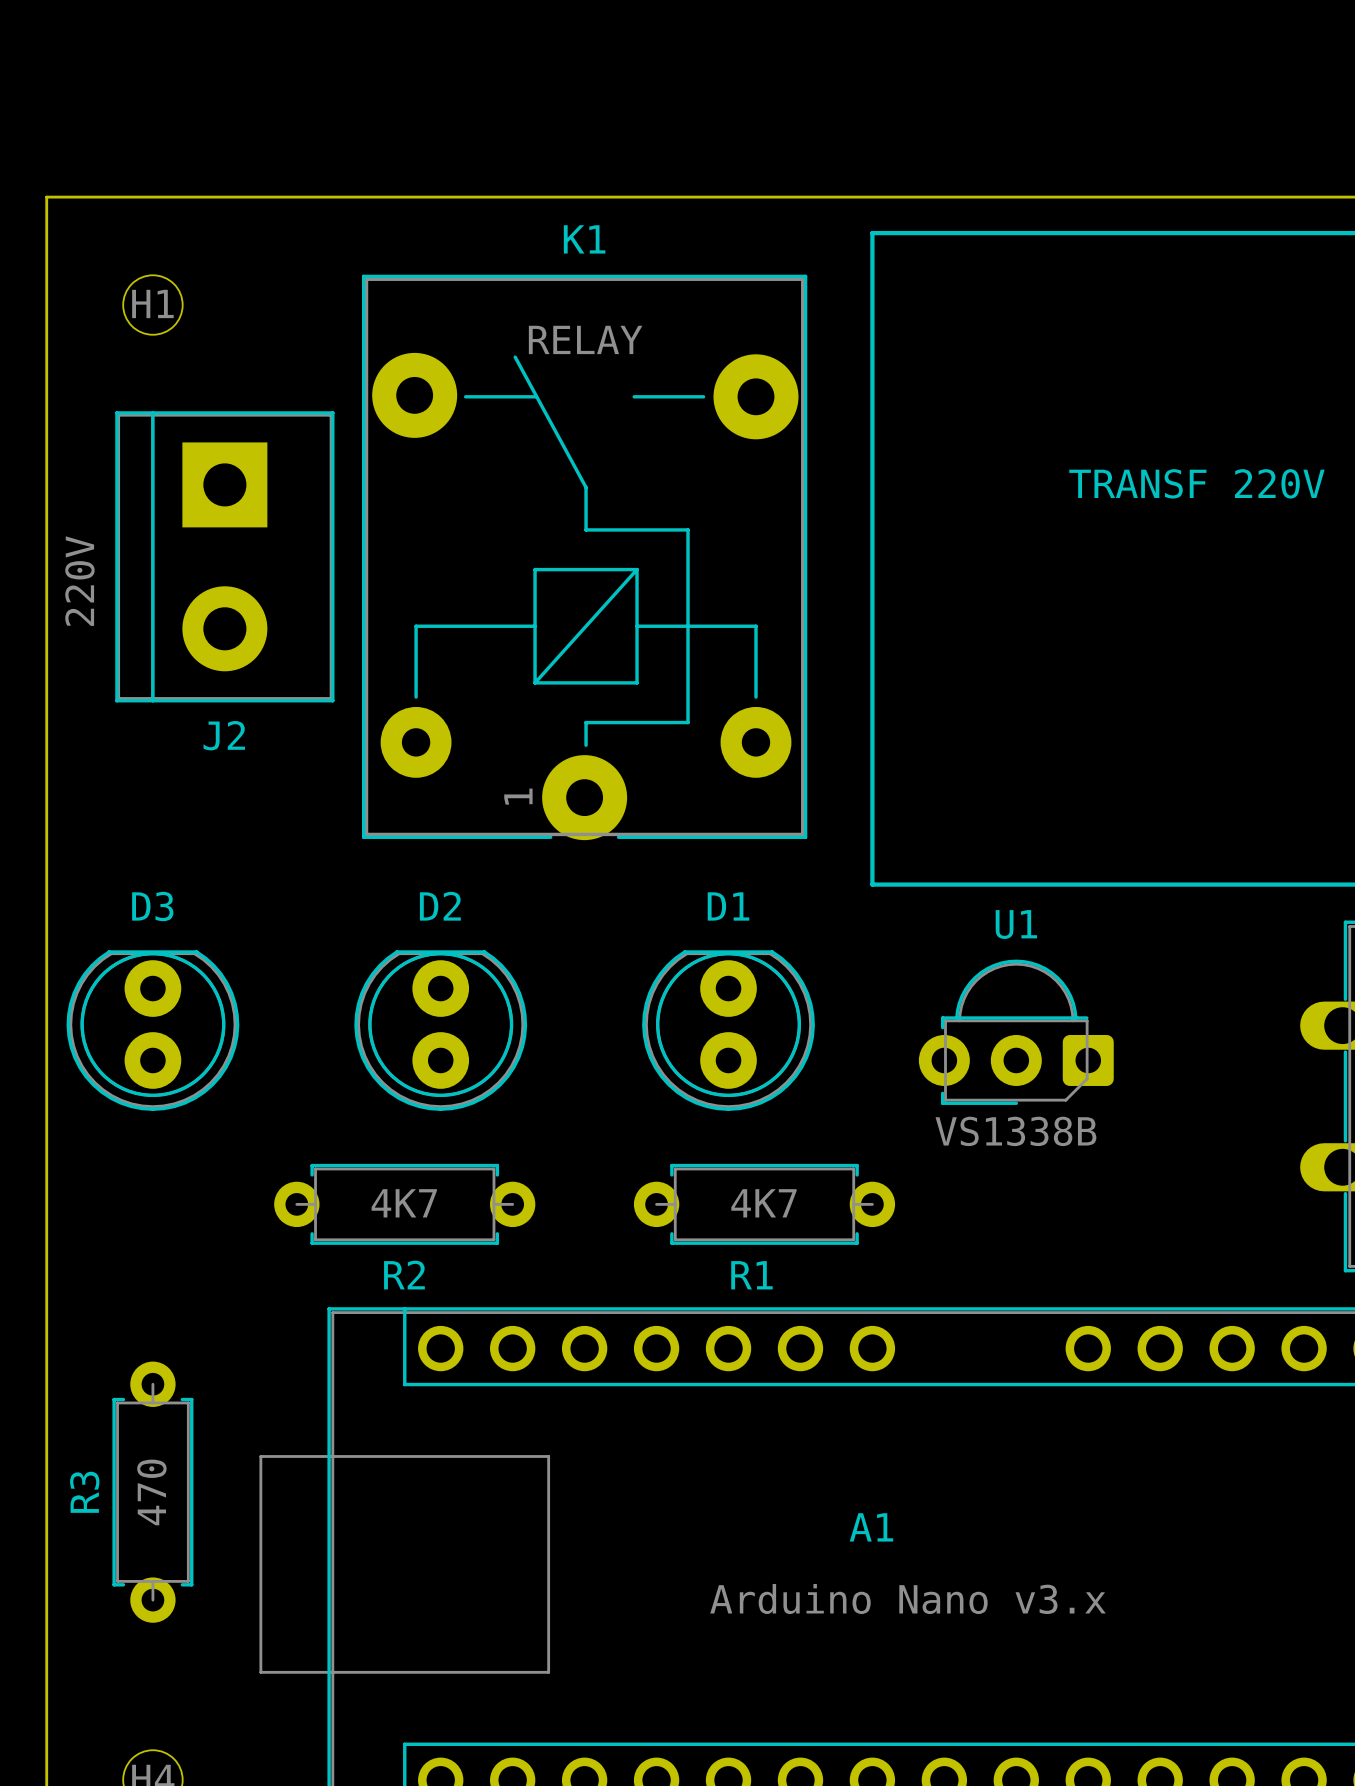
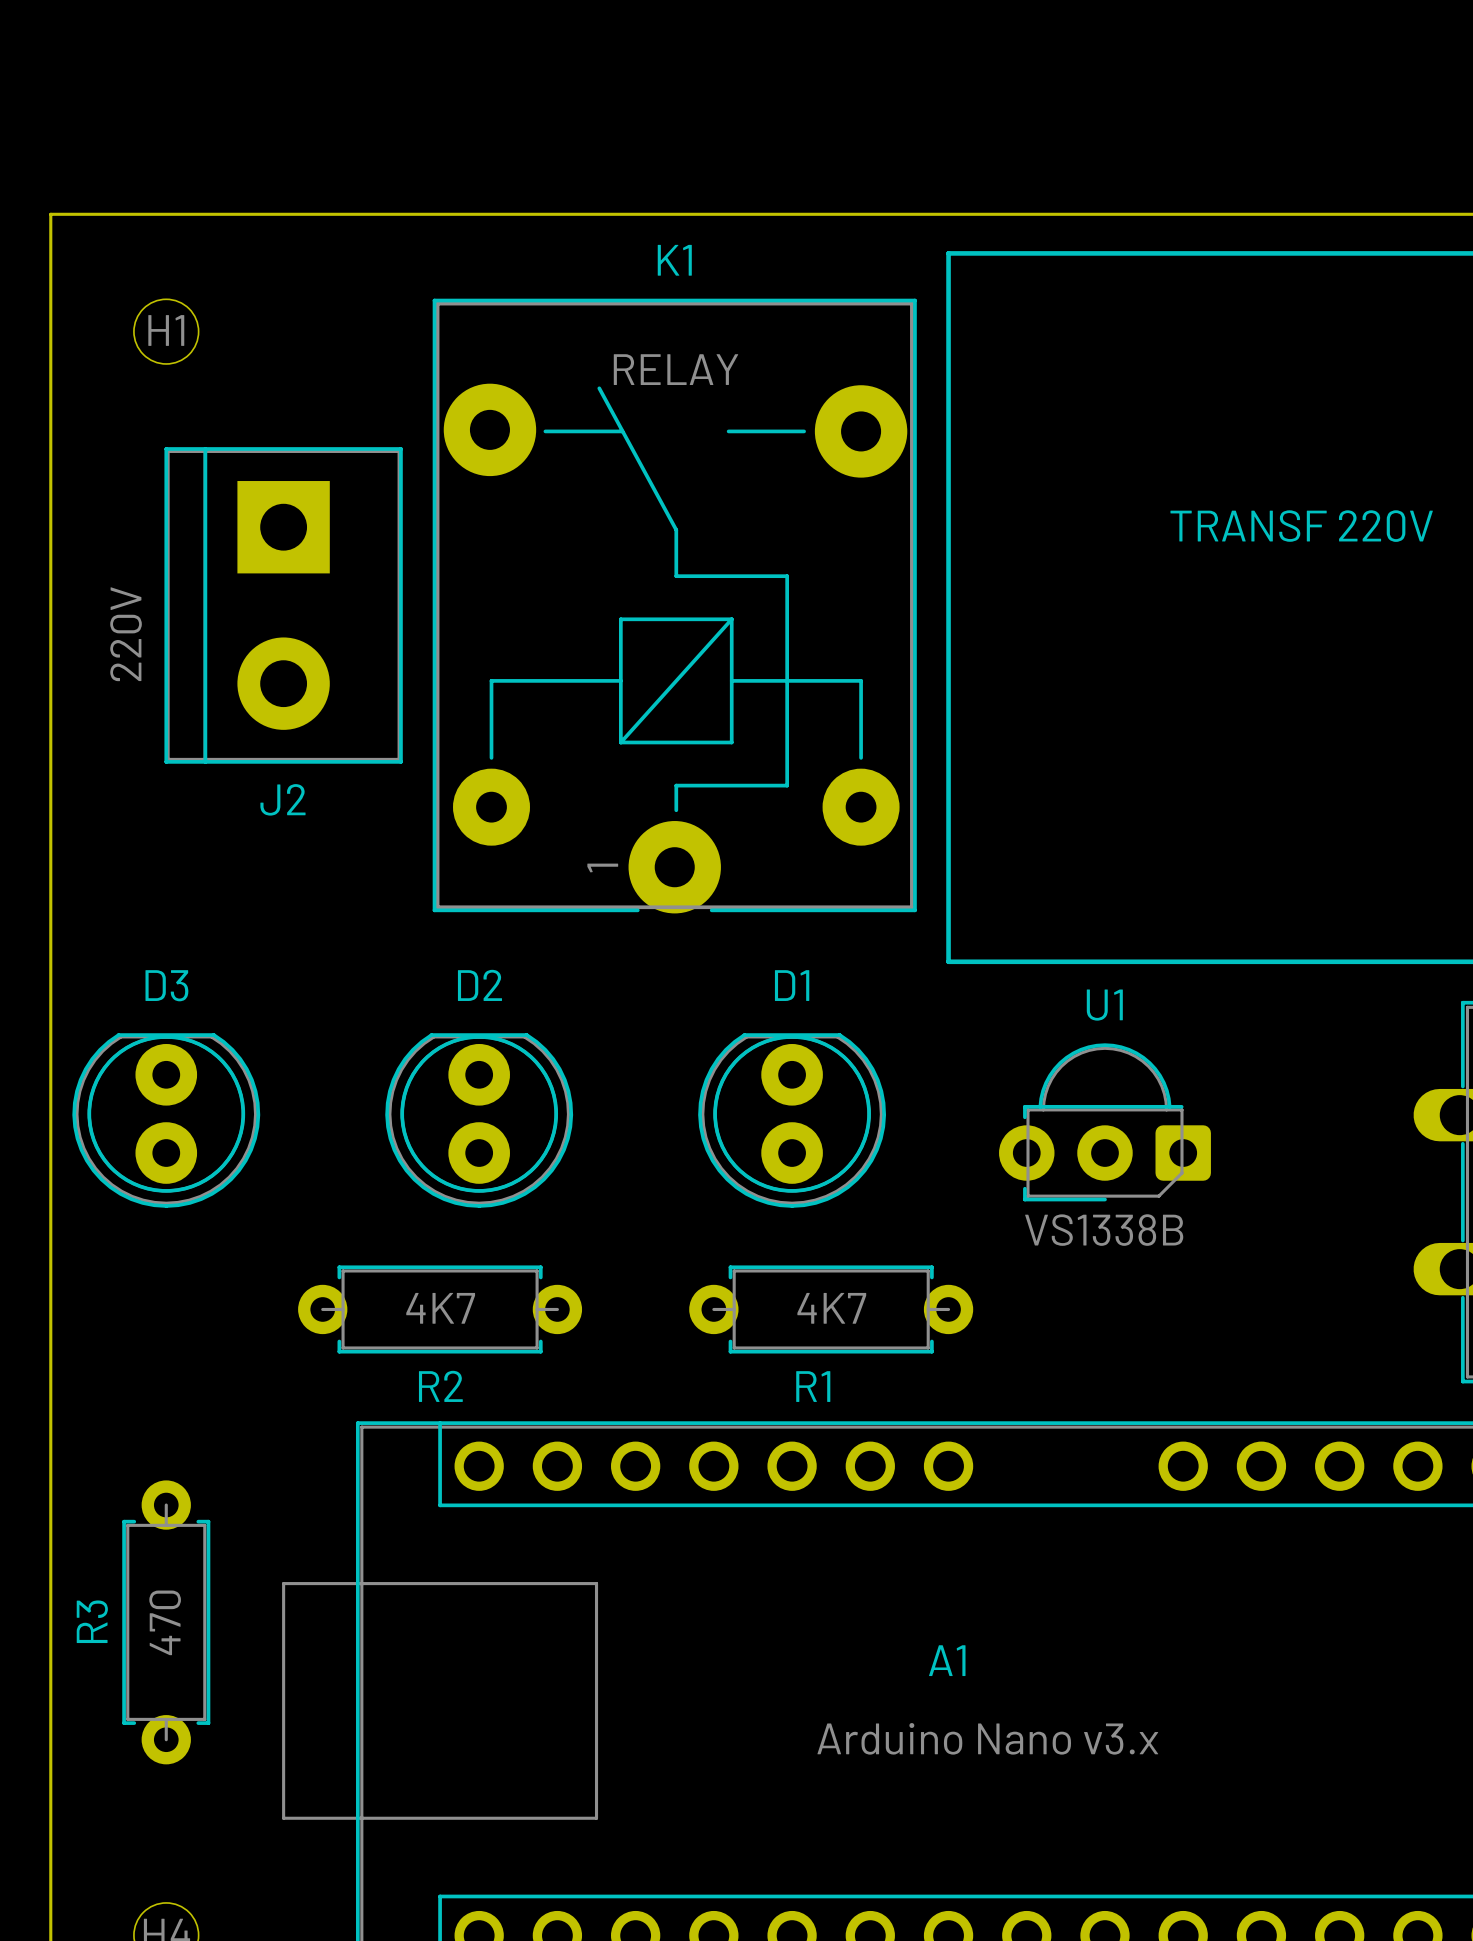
J2 position: (224, 556) -> (283, 605)
K1 position: (584, 557) -> (674, 606)

